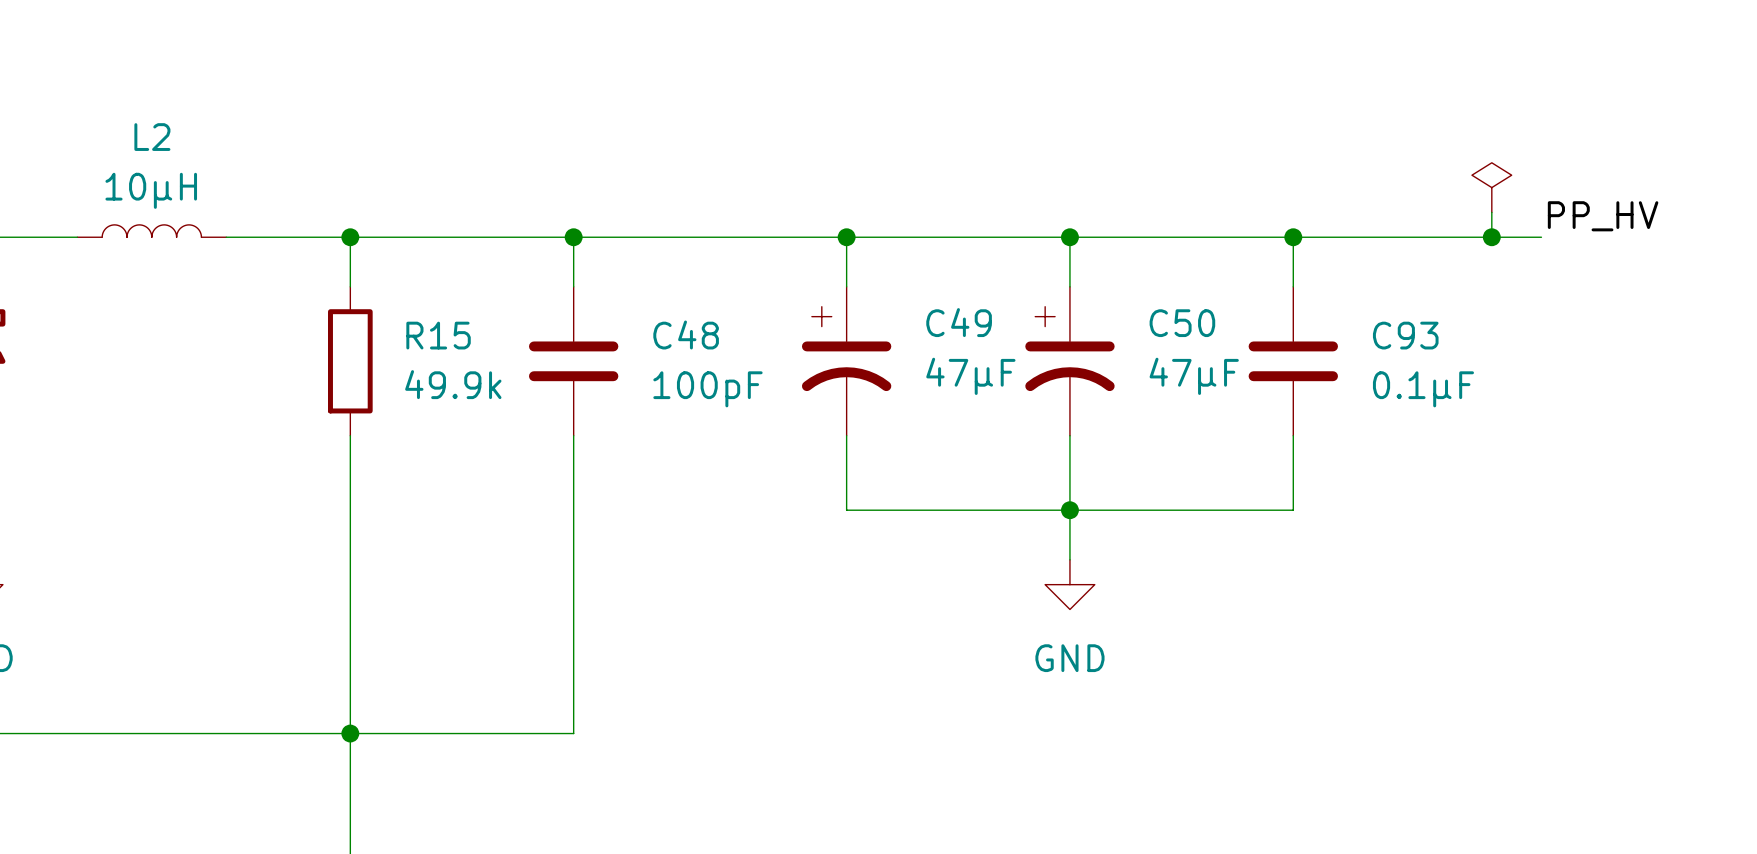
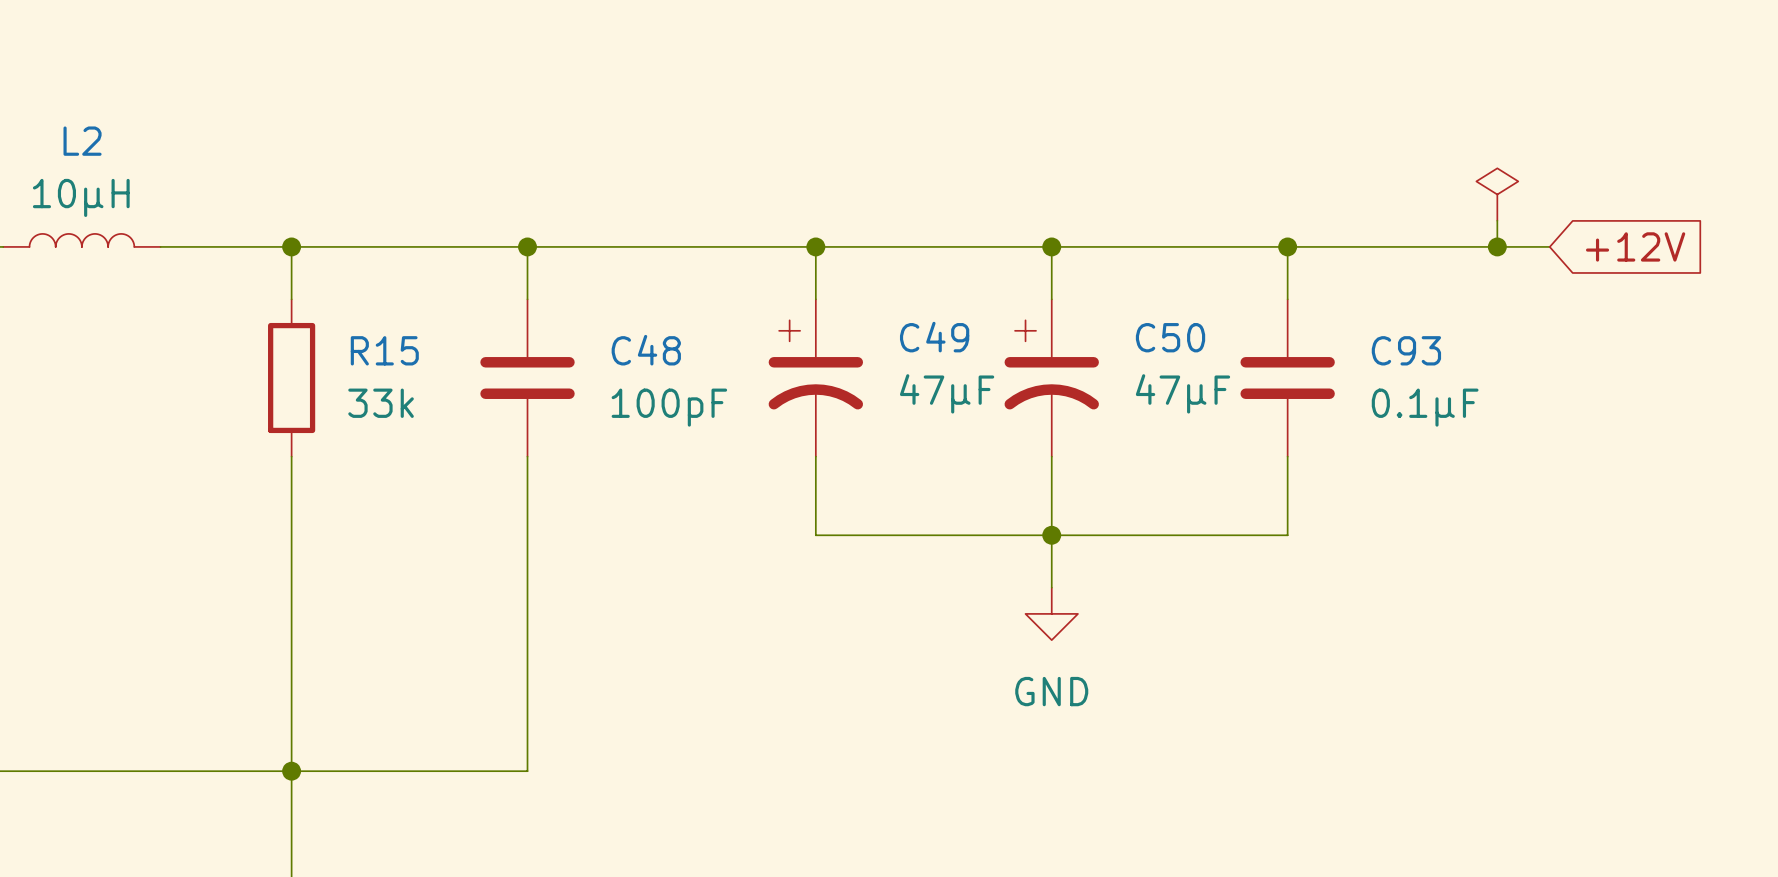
label: PP_HV (1603, 216) -> none
global label: none -> +12V (1635, 246)
R15 value: 49.9k (453, 384) -> 33k (381, 403)

